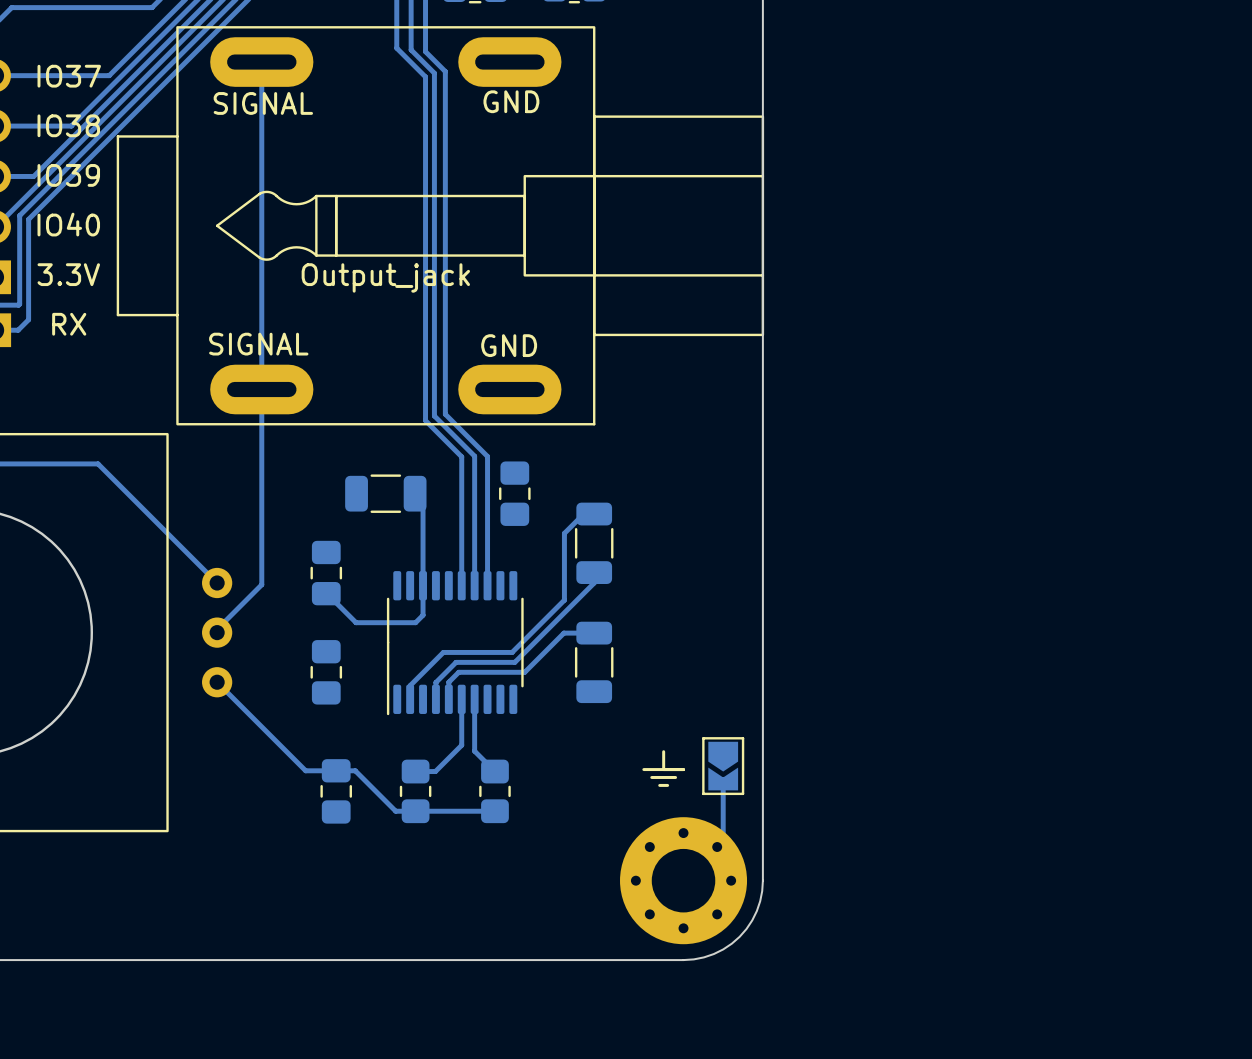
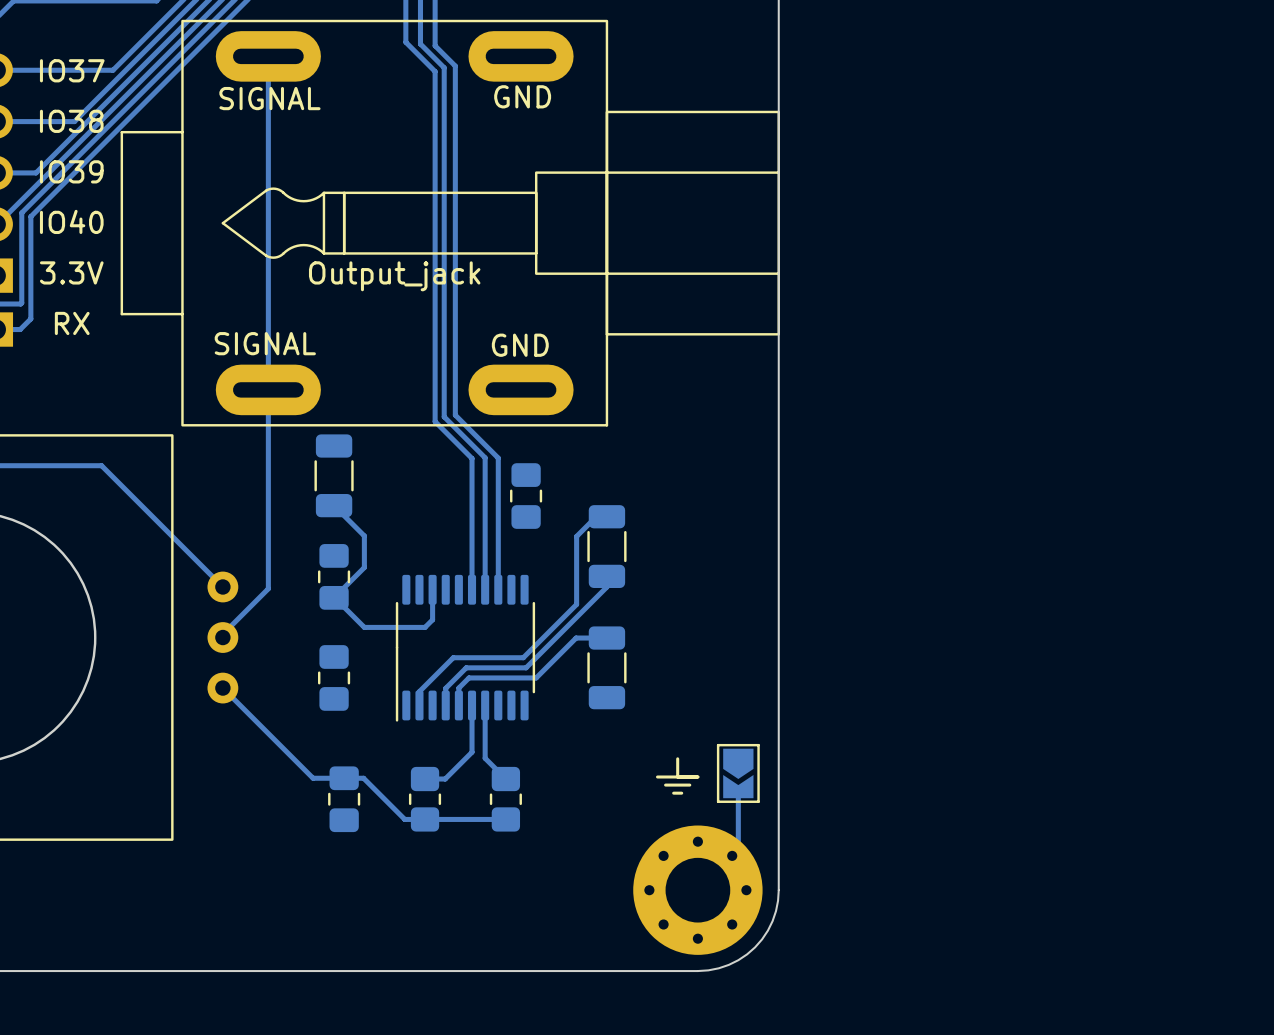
part rotation: 0° (385, 493) -> 90° clockwise (334, 475)
part position: (385, 493) -> (334, 475)
track: (415, 493) (423, 501) (423, 585) -> none
track: none -> (334, 505) (364, 535) (364, 567) (334, 597)

